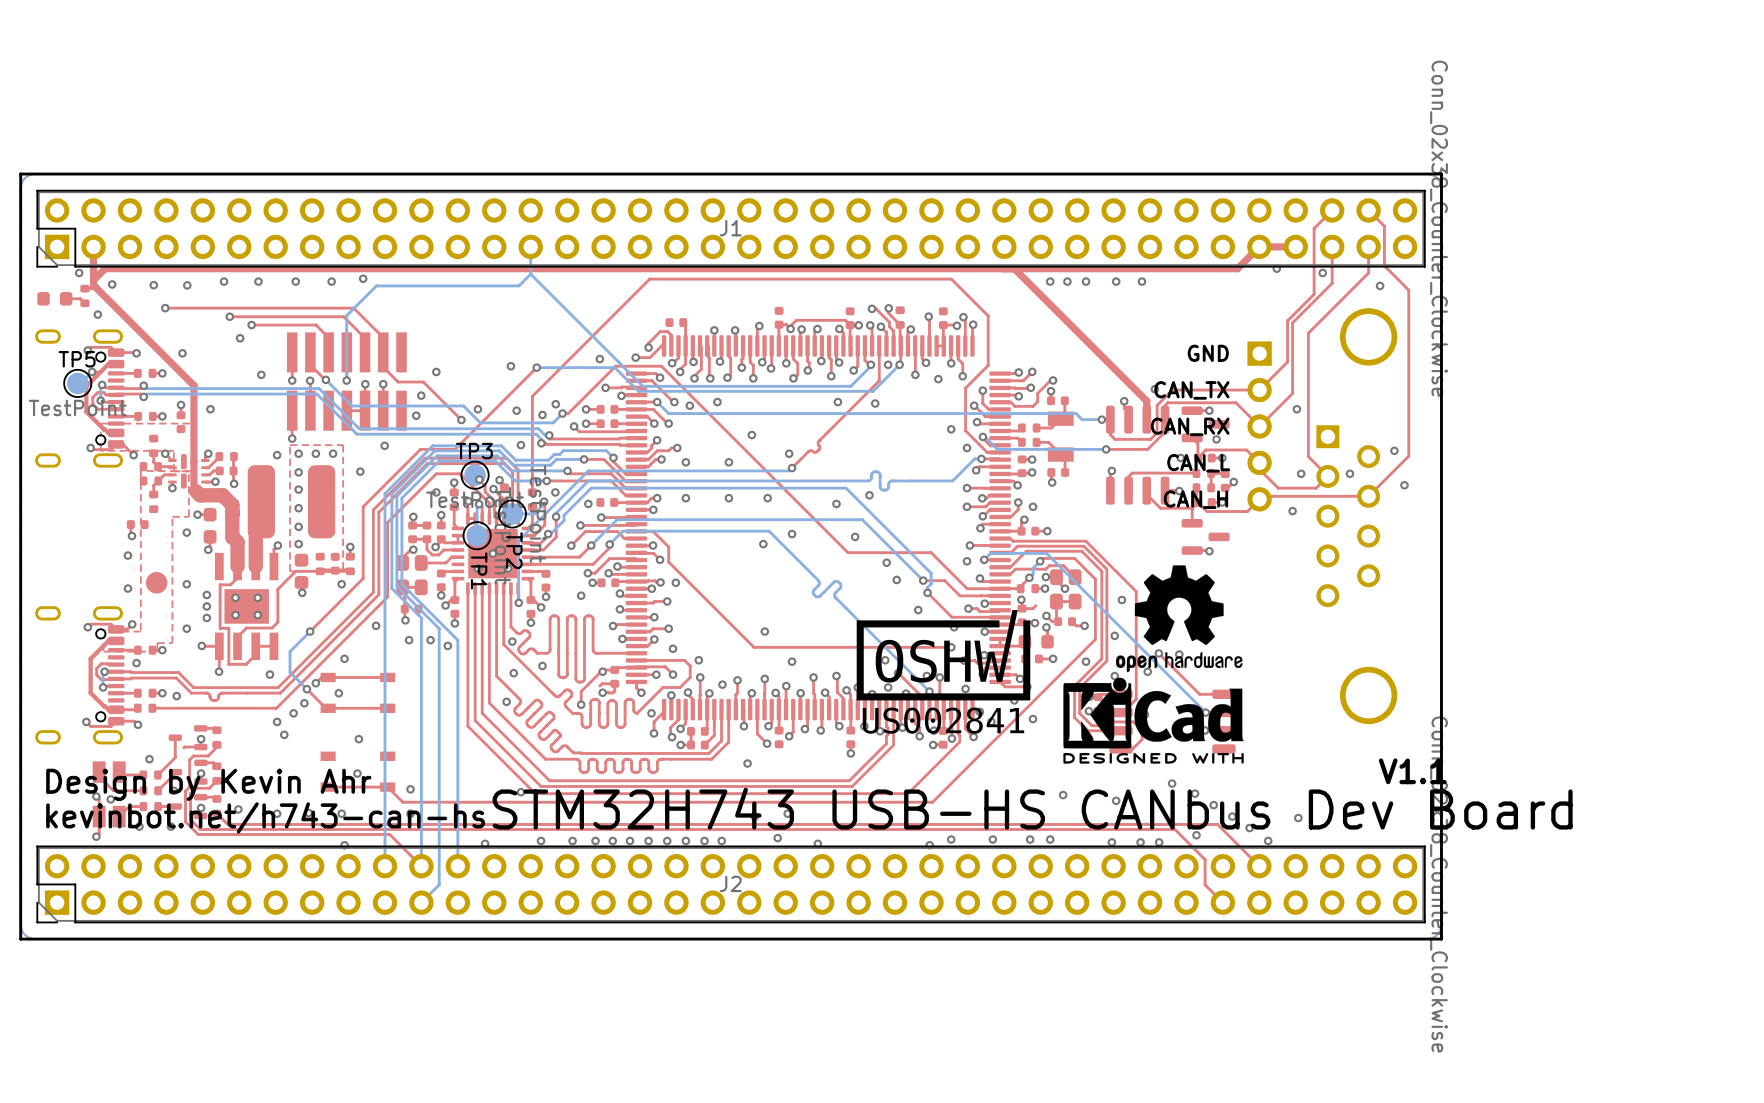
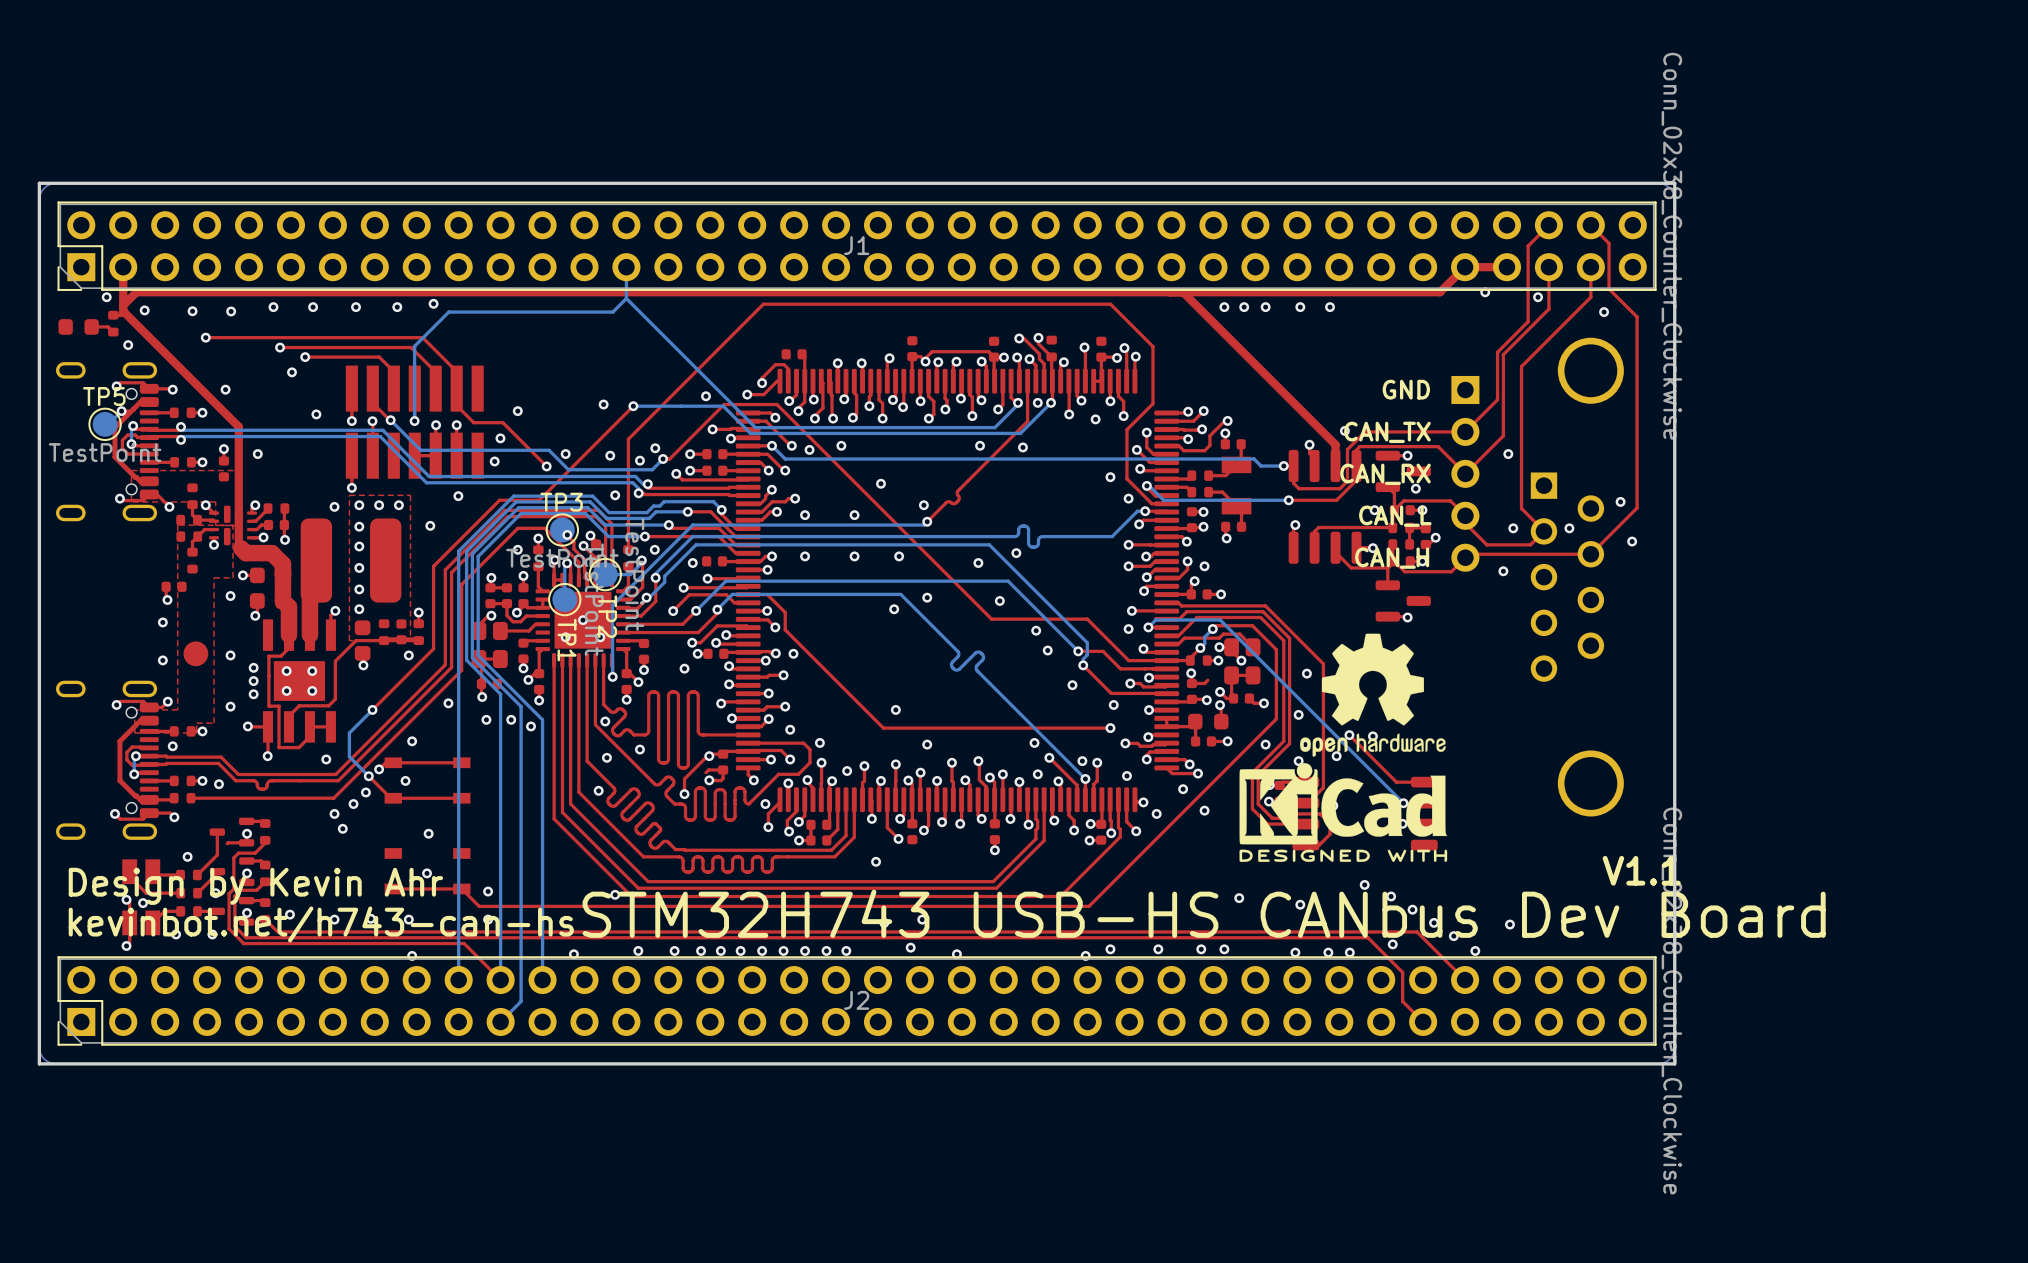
drawing: [856, 610, 1031, 734] -> none

